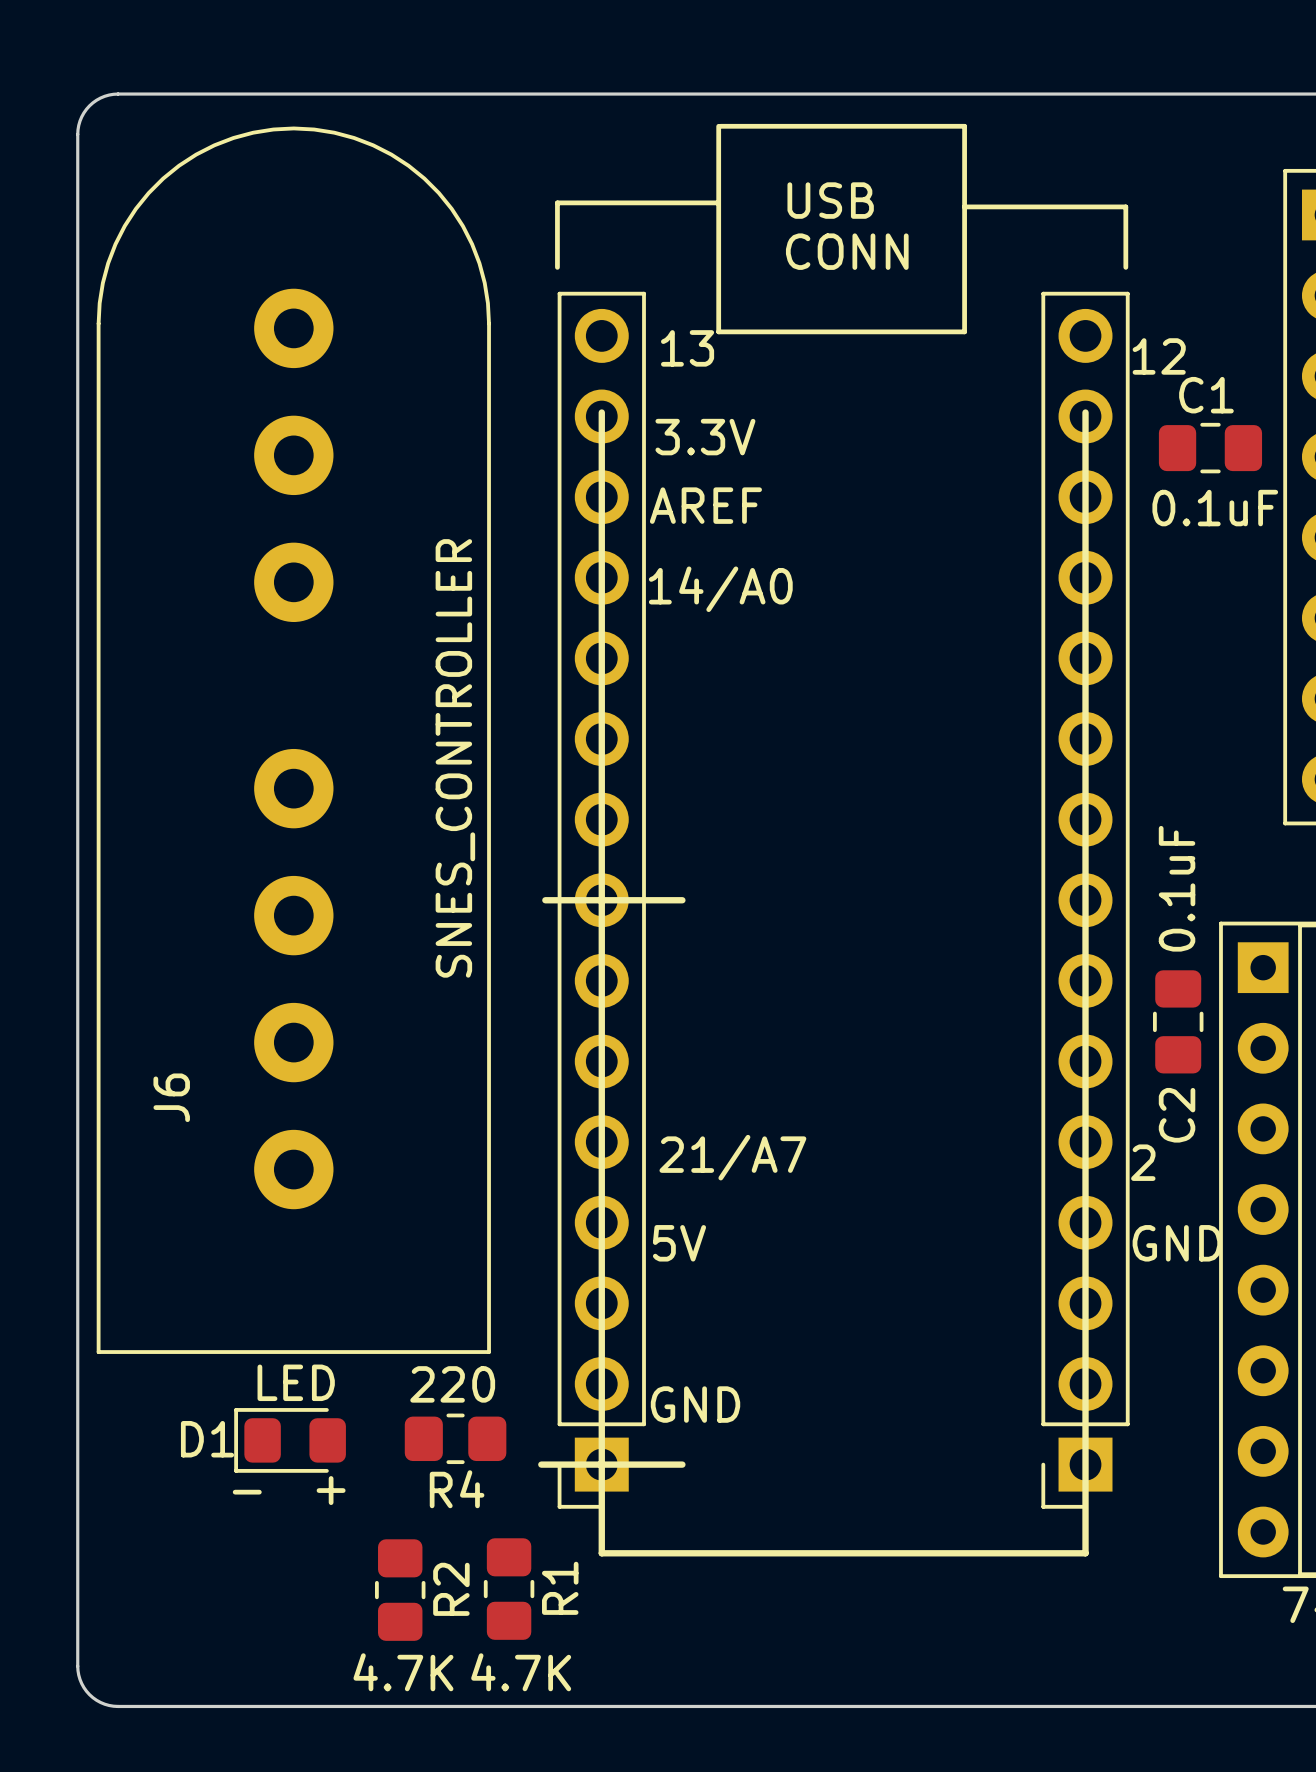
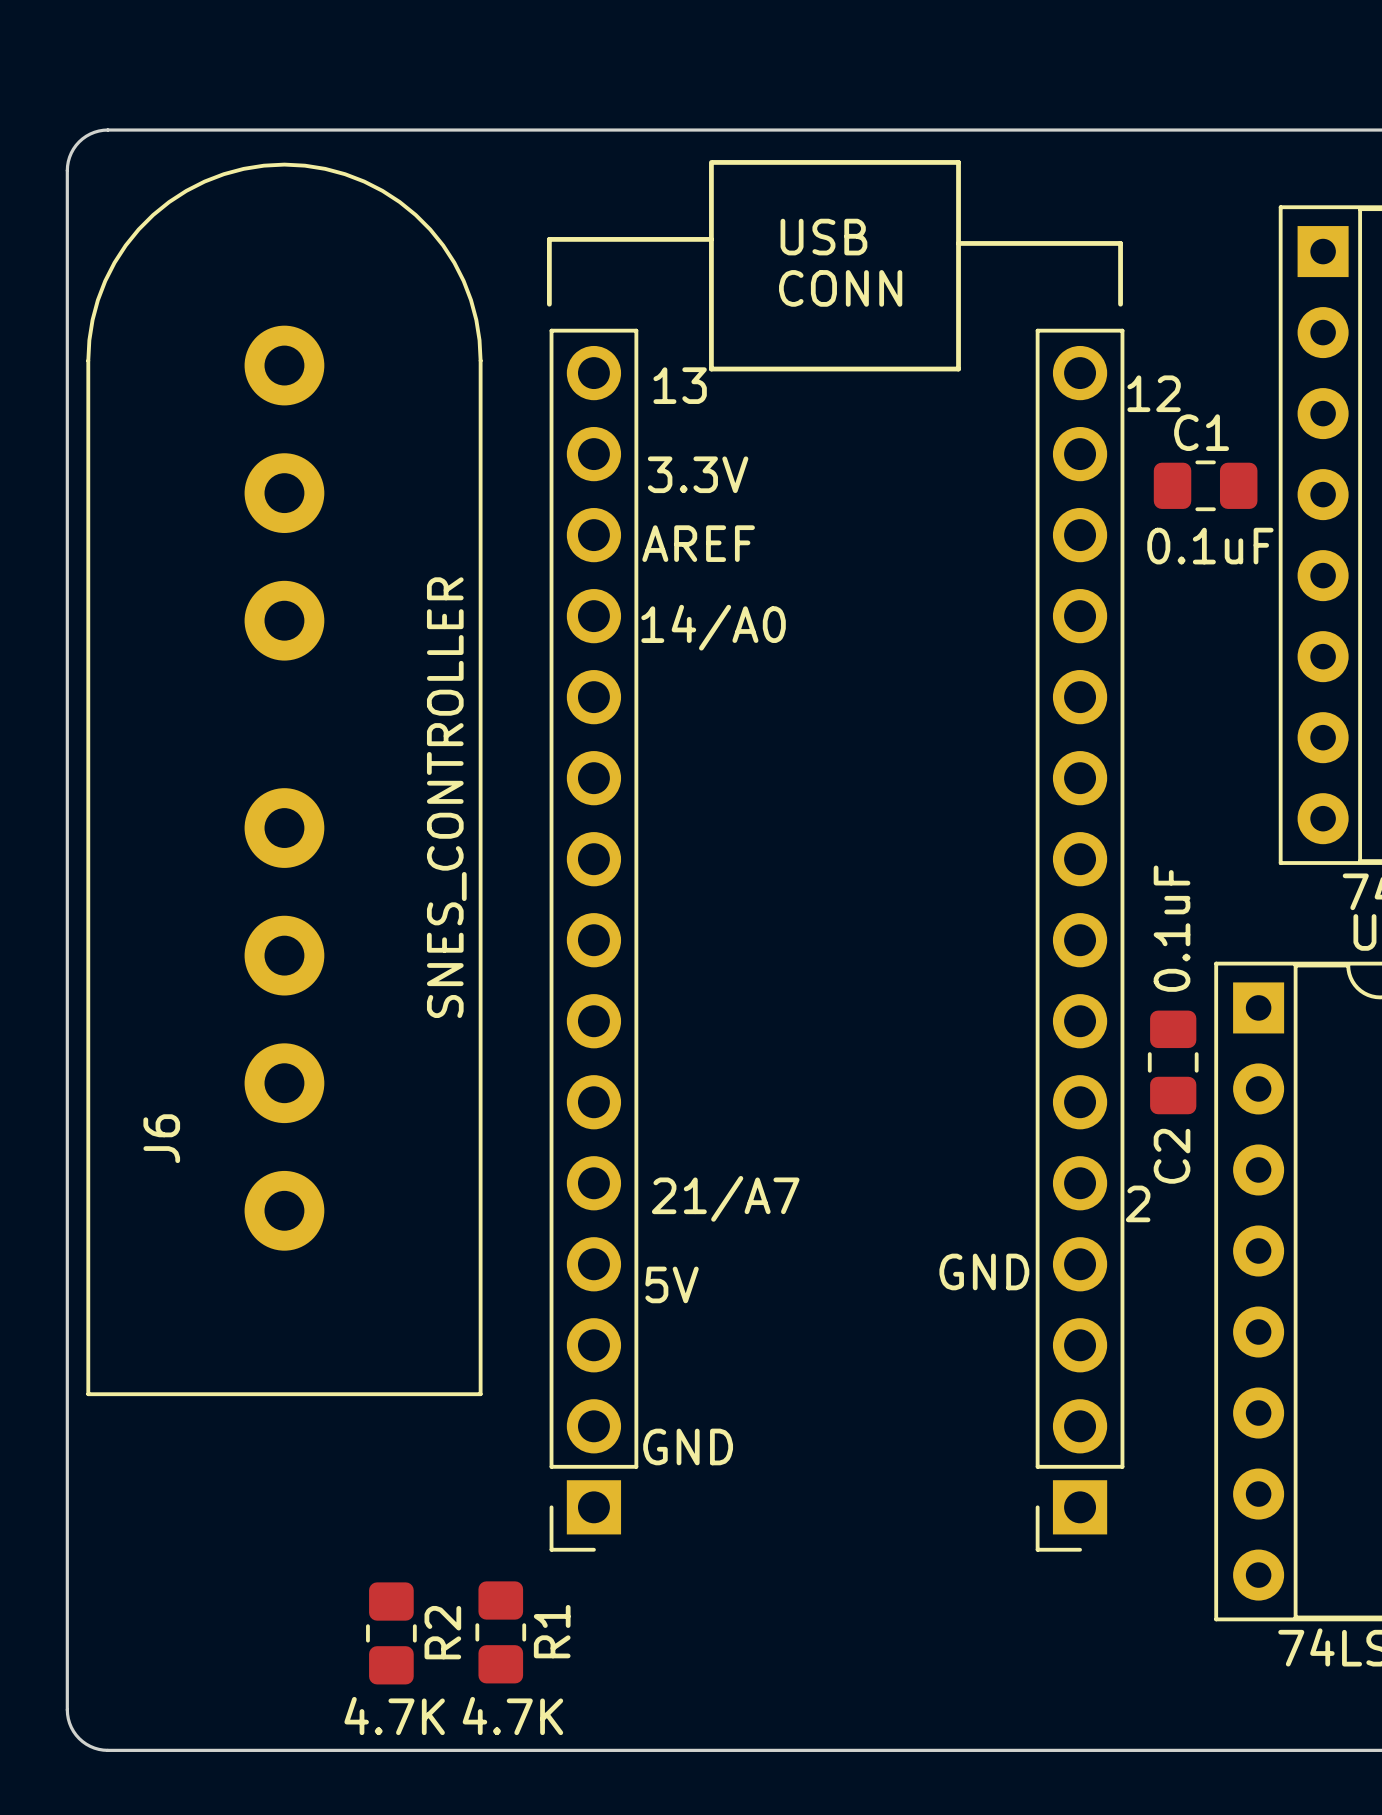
line: (601, 412) (601, 1553) (1085, 1553) (1085, 412) -> none
line: (545, 900) (682, 900) -> none
text position: GND (1177, 1243) -> GND (984, 1271)
R4: 220 (455, 1438) -> none
D1: LED (290, 1440) -> none
line: (541, 1464) (682, 1464) -> none
text: + (331, 1490) -> none
text: - (247, 1492) -> none

